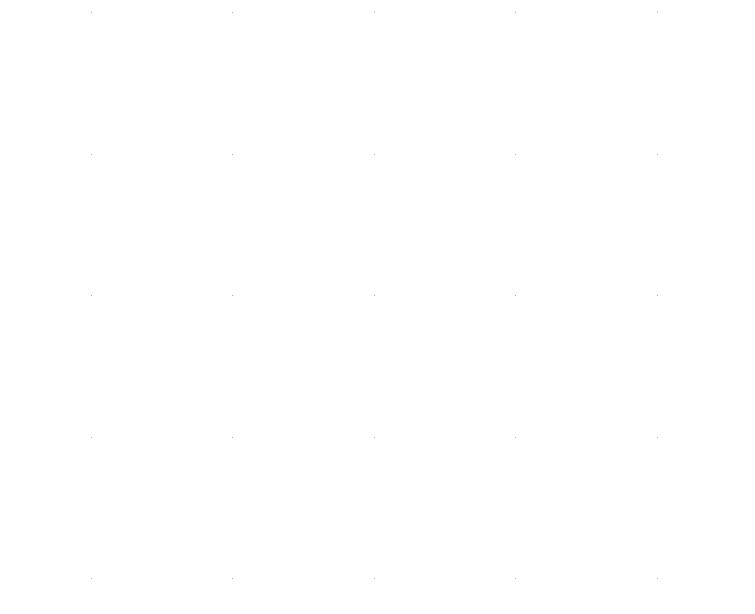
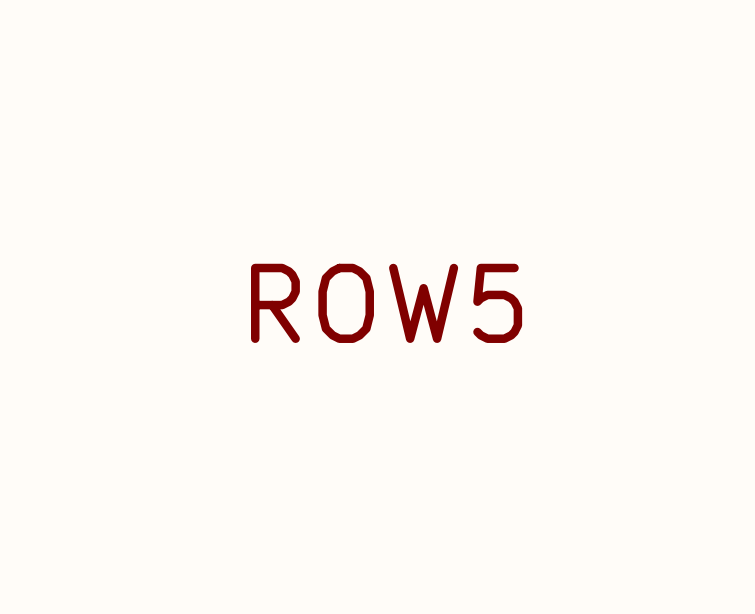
label: none -> ROW5 (386, 303)

